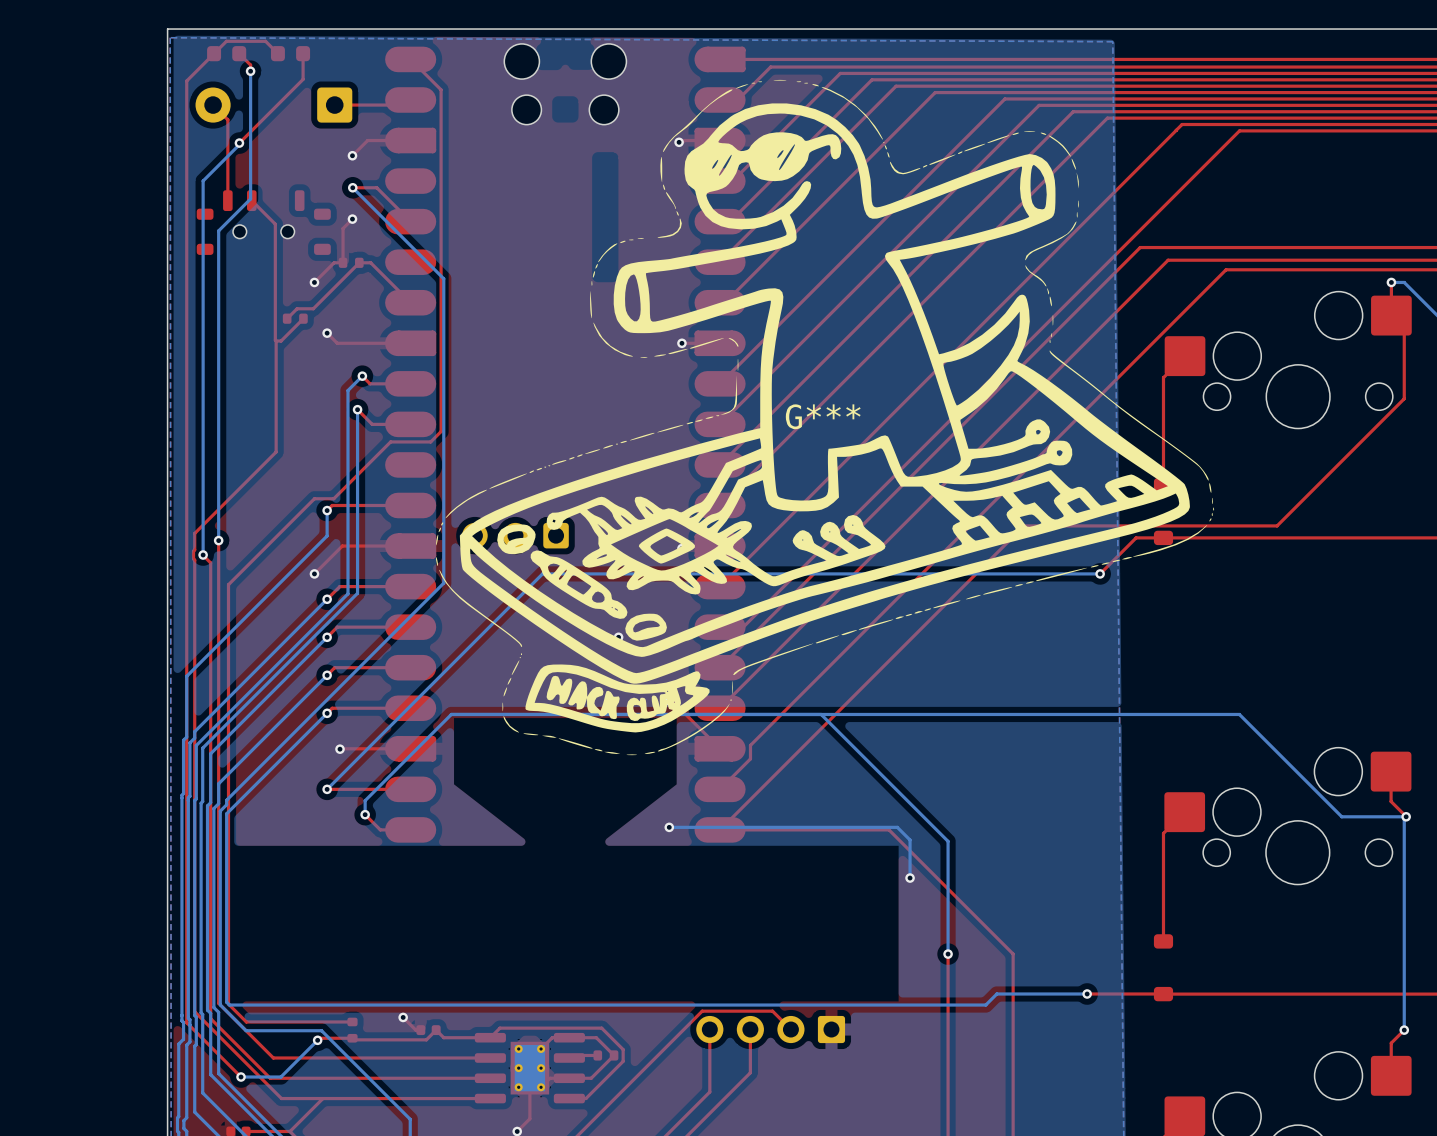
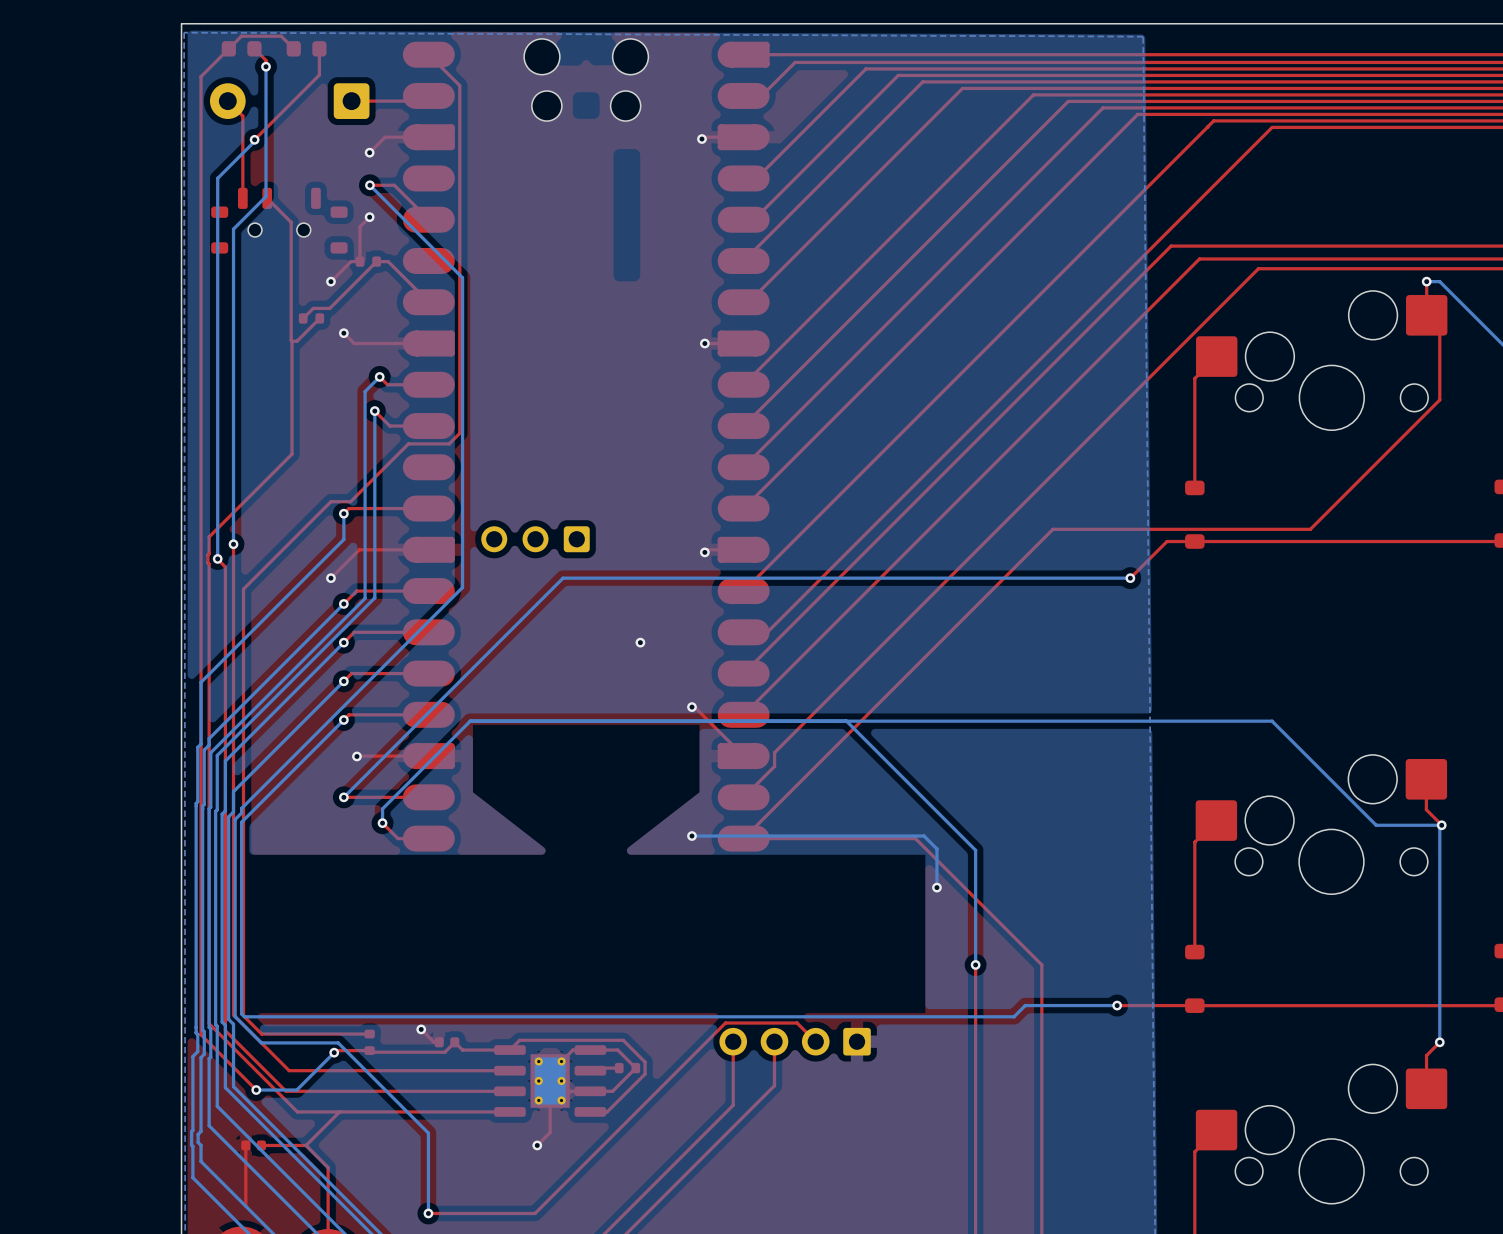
G***: (825, 417) -> none

